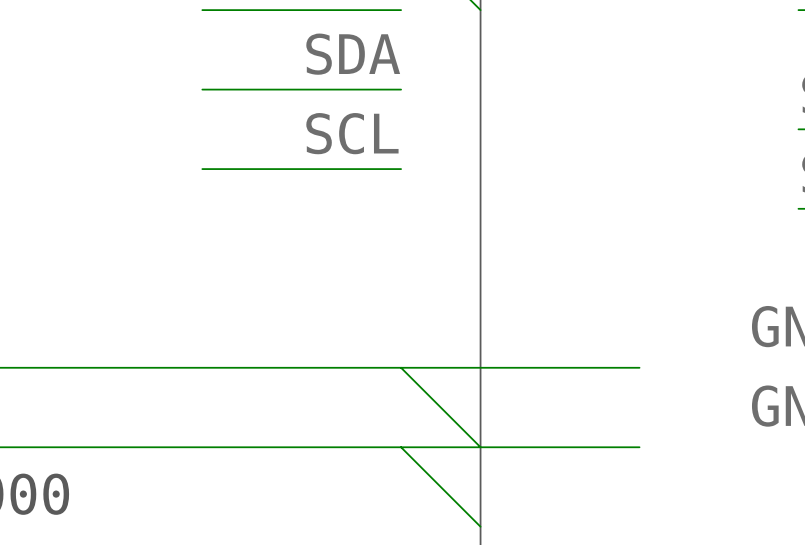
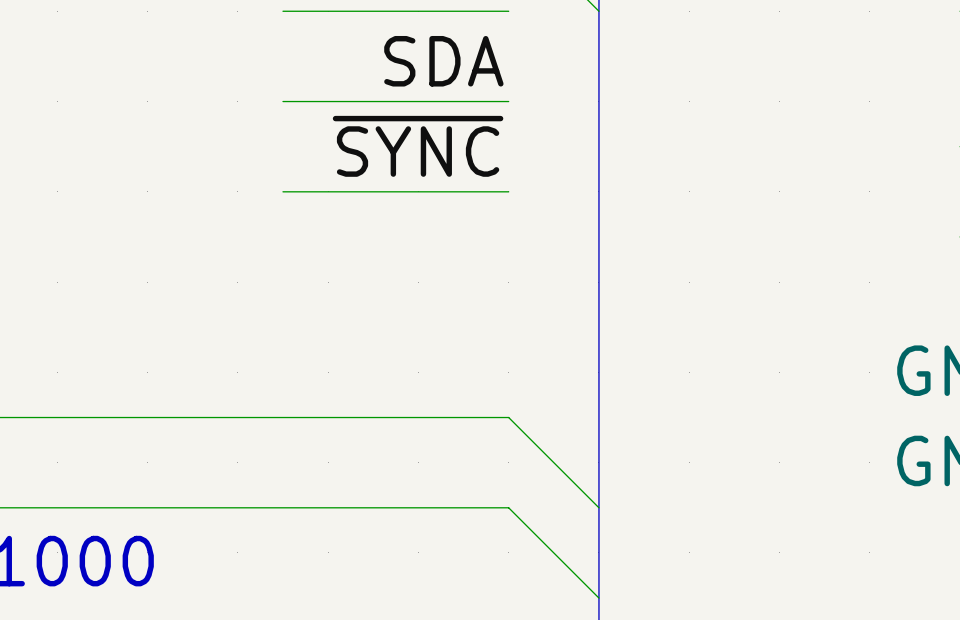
label: SCL (352, 133) -> ~{SYNC} (418, 146)
wire: (401, 367) (639, 367) -> none
wire: (401, 447) (639, 447) -> none

